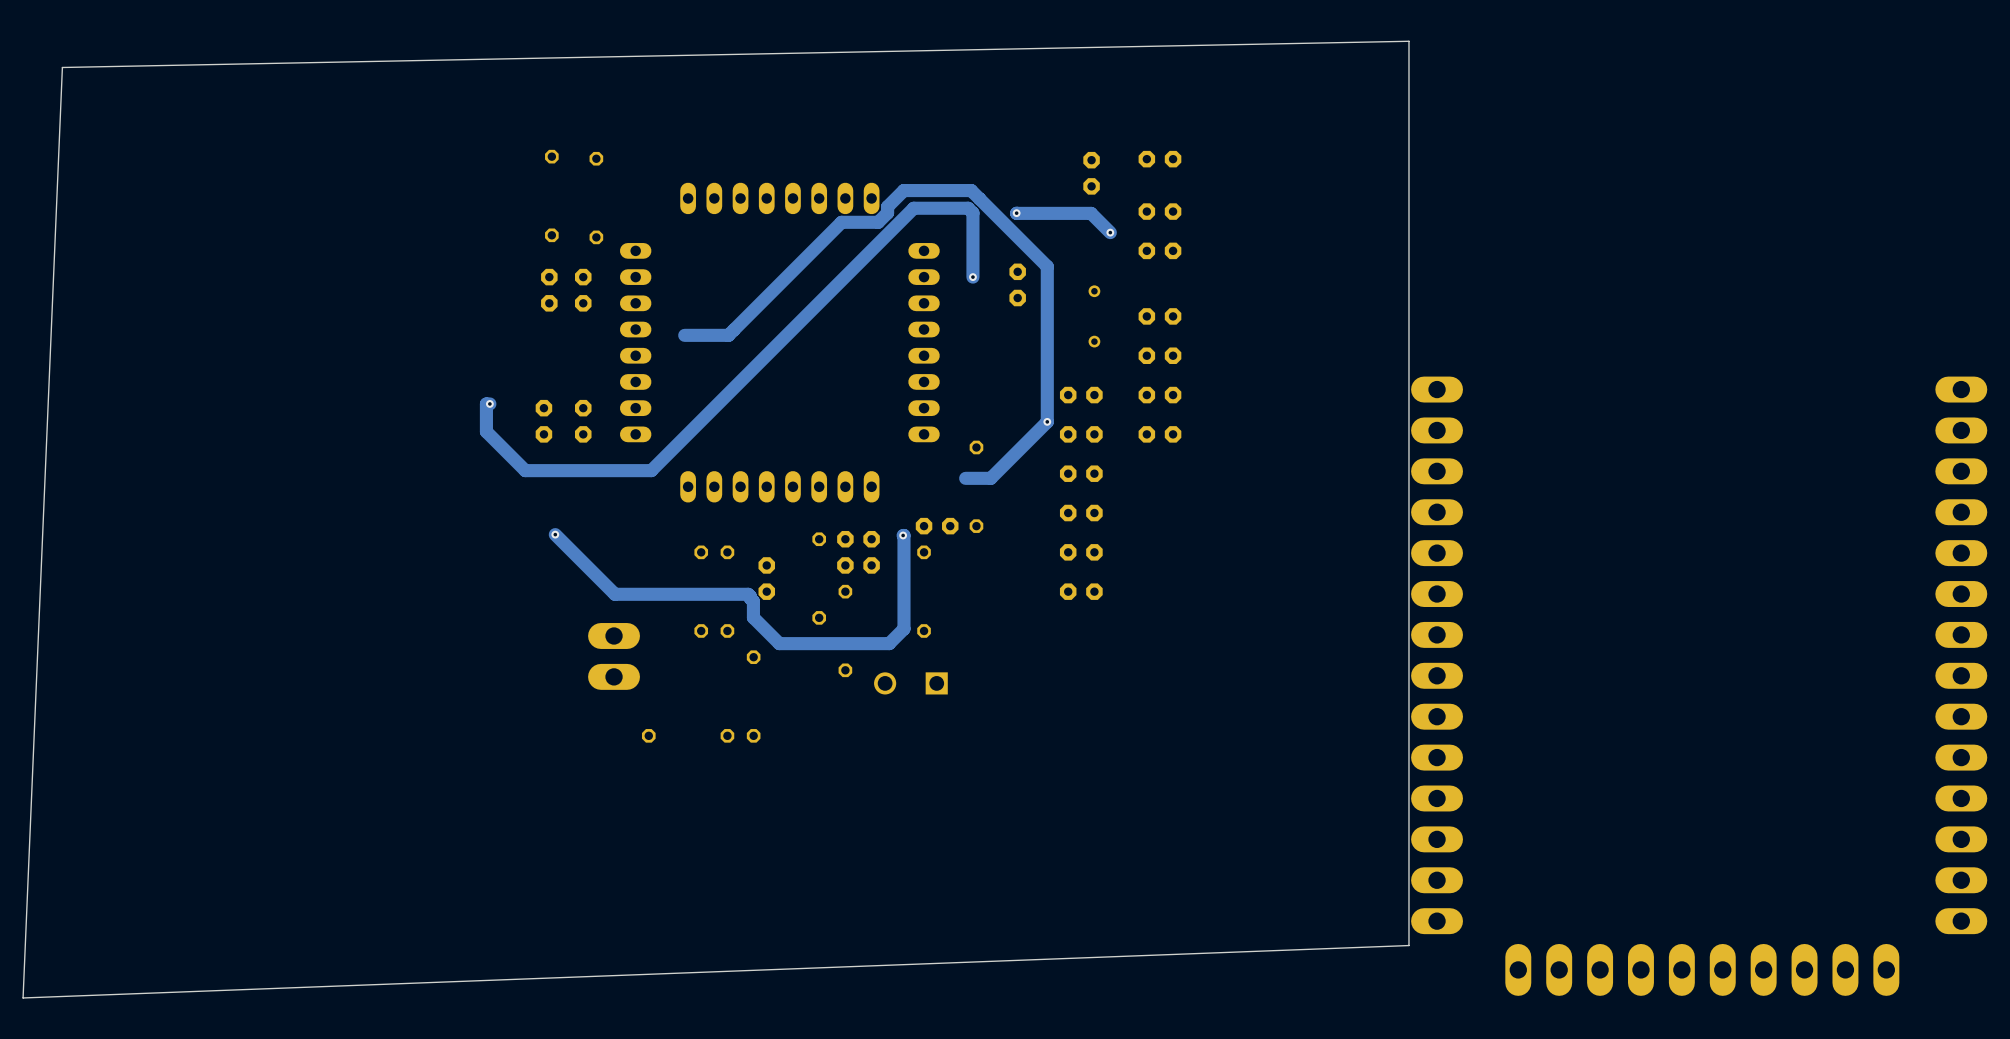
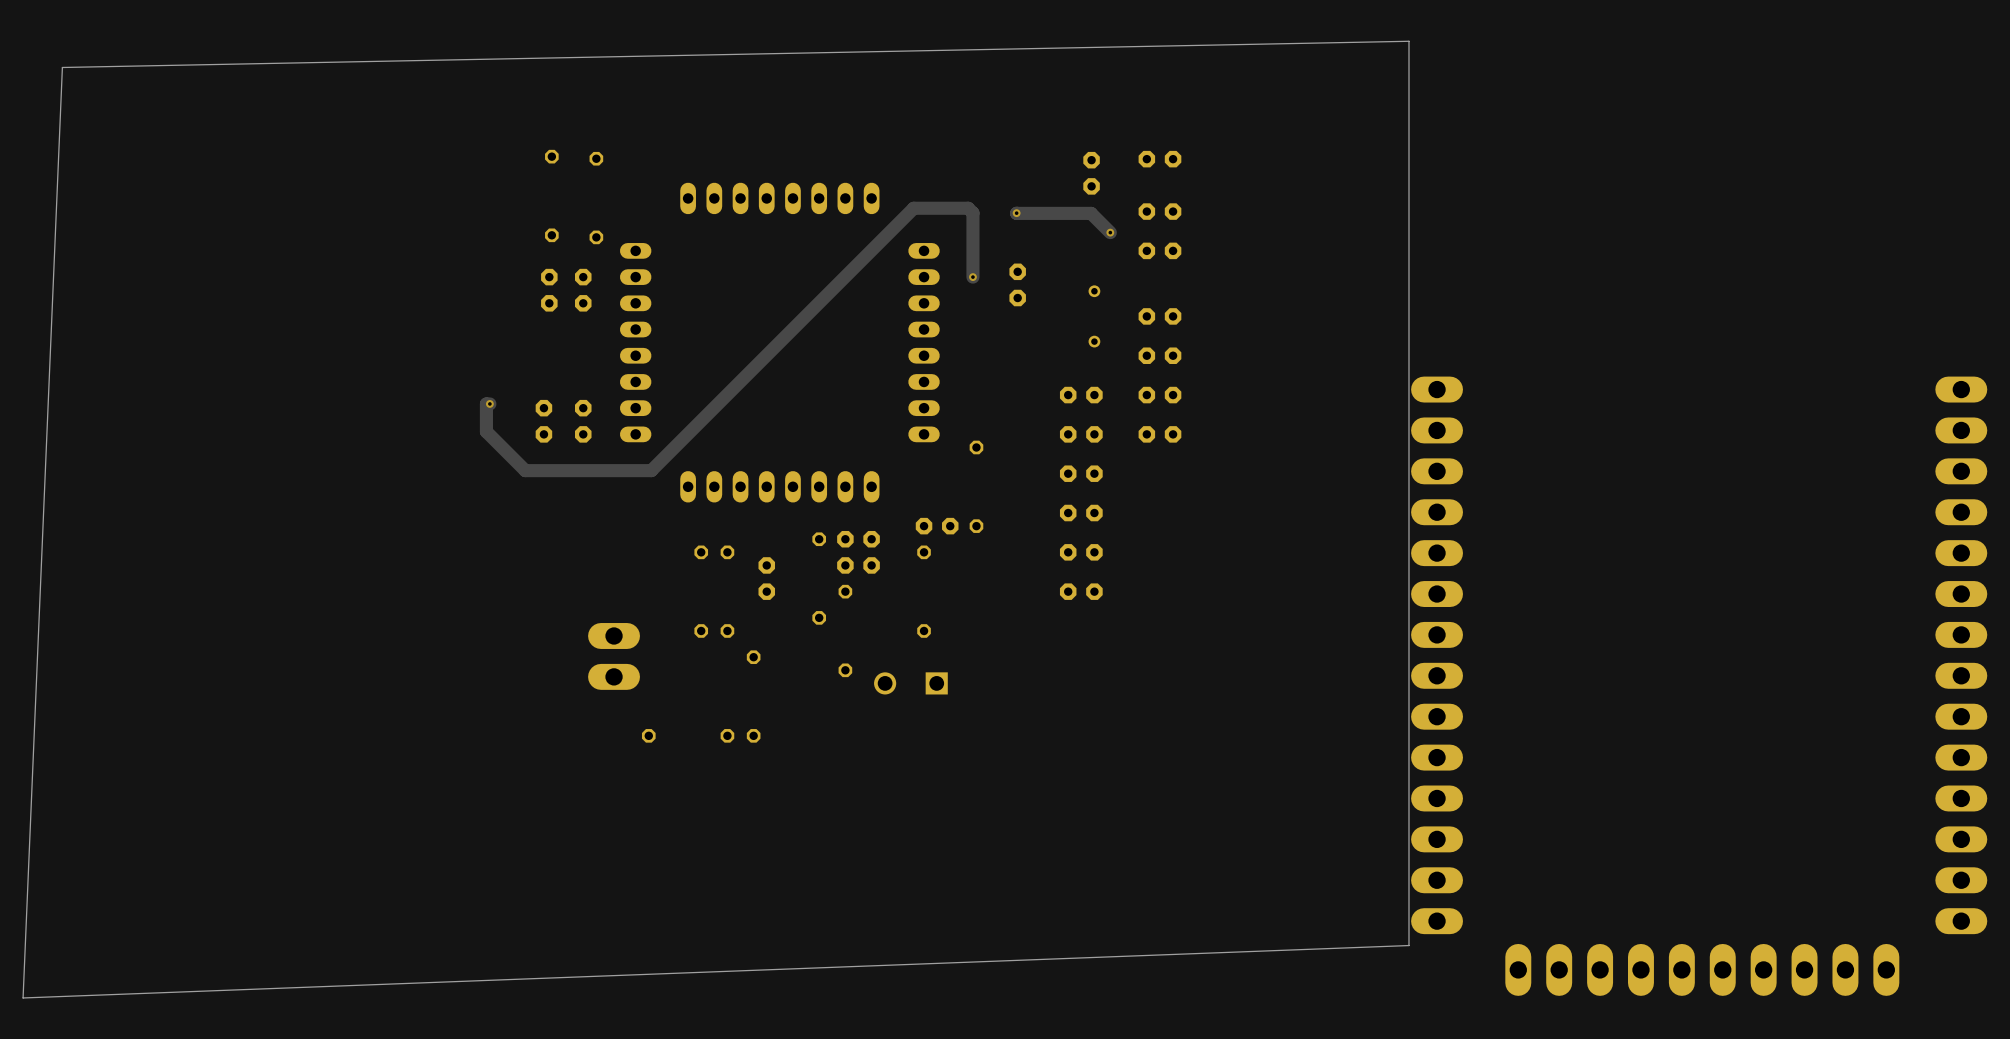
track: (684, 335) (728, 335) (841, 222) (878, 222) (887, 212) (887, 206) (903, 190) (971, 190) (1047, 266) (1047, 421) (990, 478) (965, 478) -> none
via: (1047, 421) -> none
track: (555, 534) (615, 594) (748, 594) (753, 601) (753, 617) (779, 643) (889, 643) (903, 628) (903, 535) -> none
via: (555, 534) -> none
via: (903, 535) -> none

